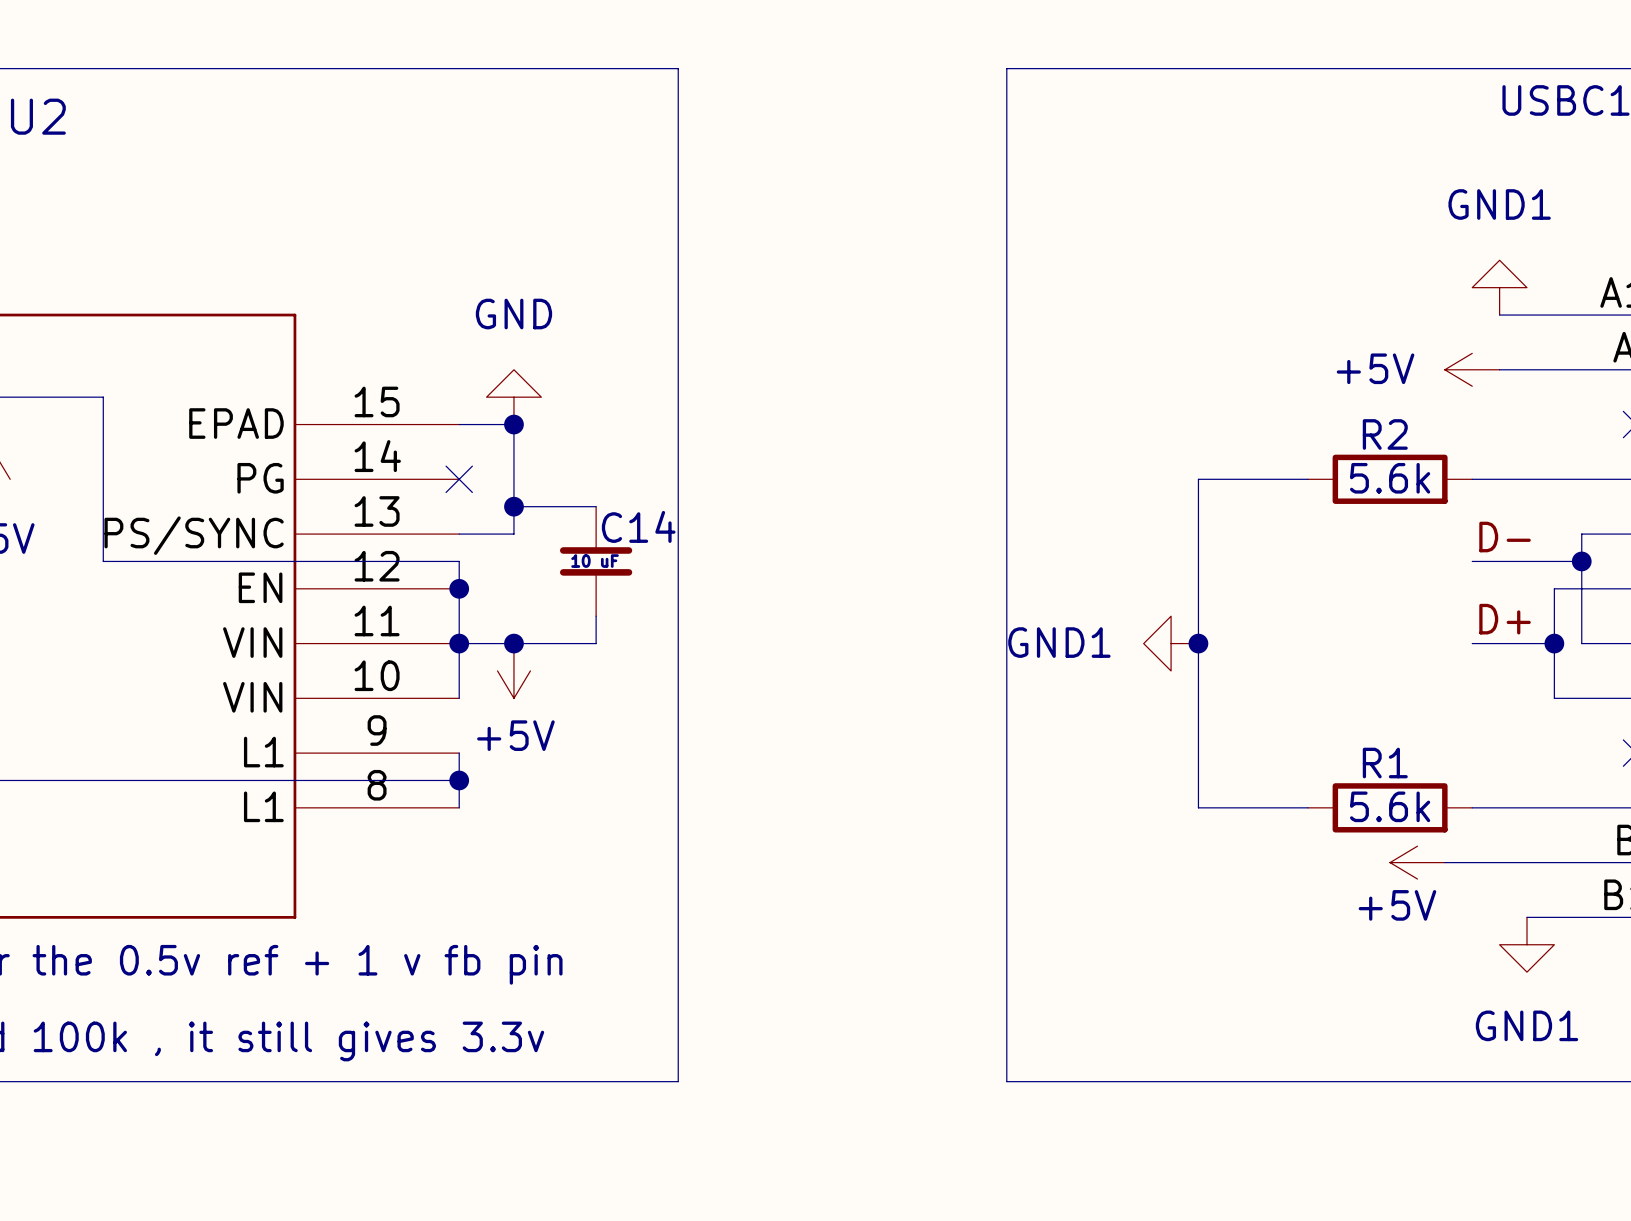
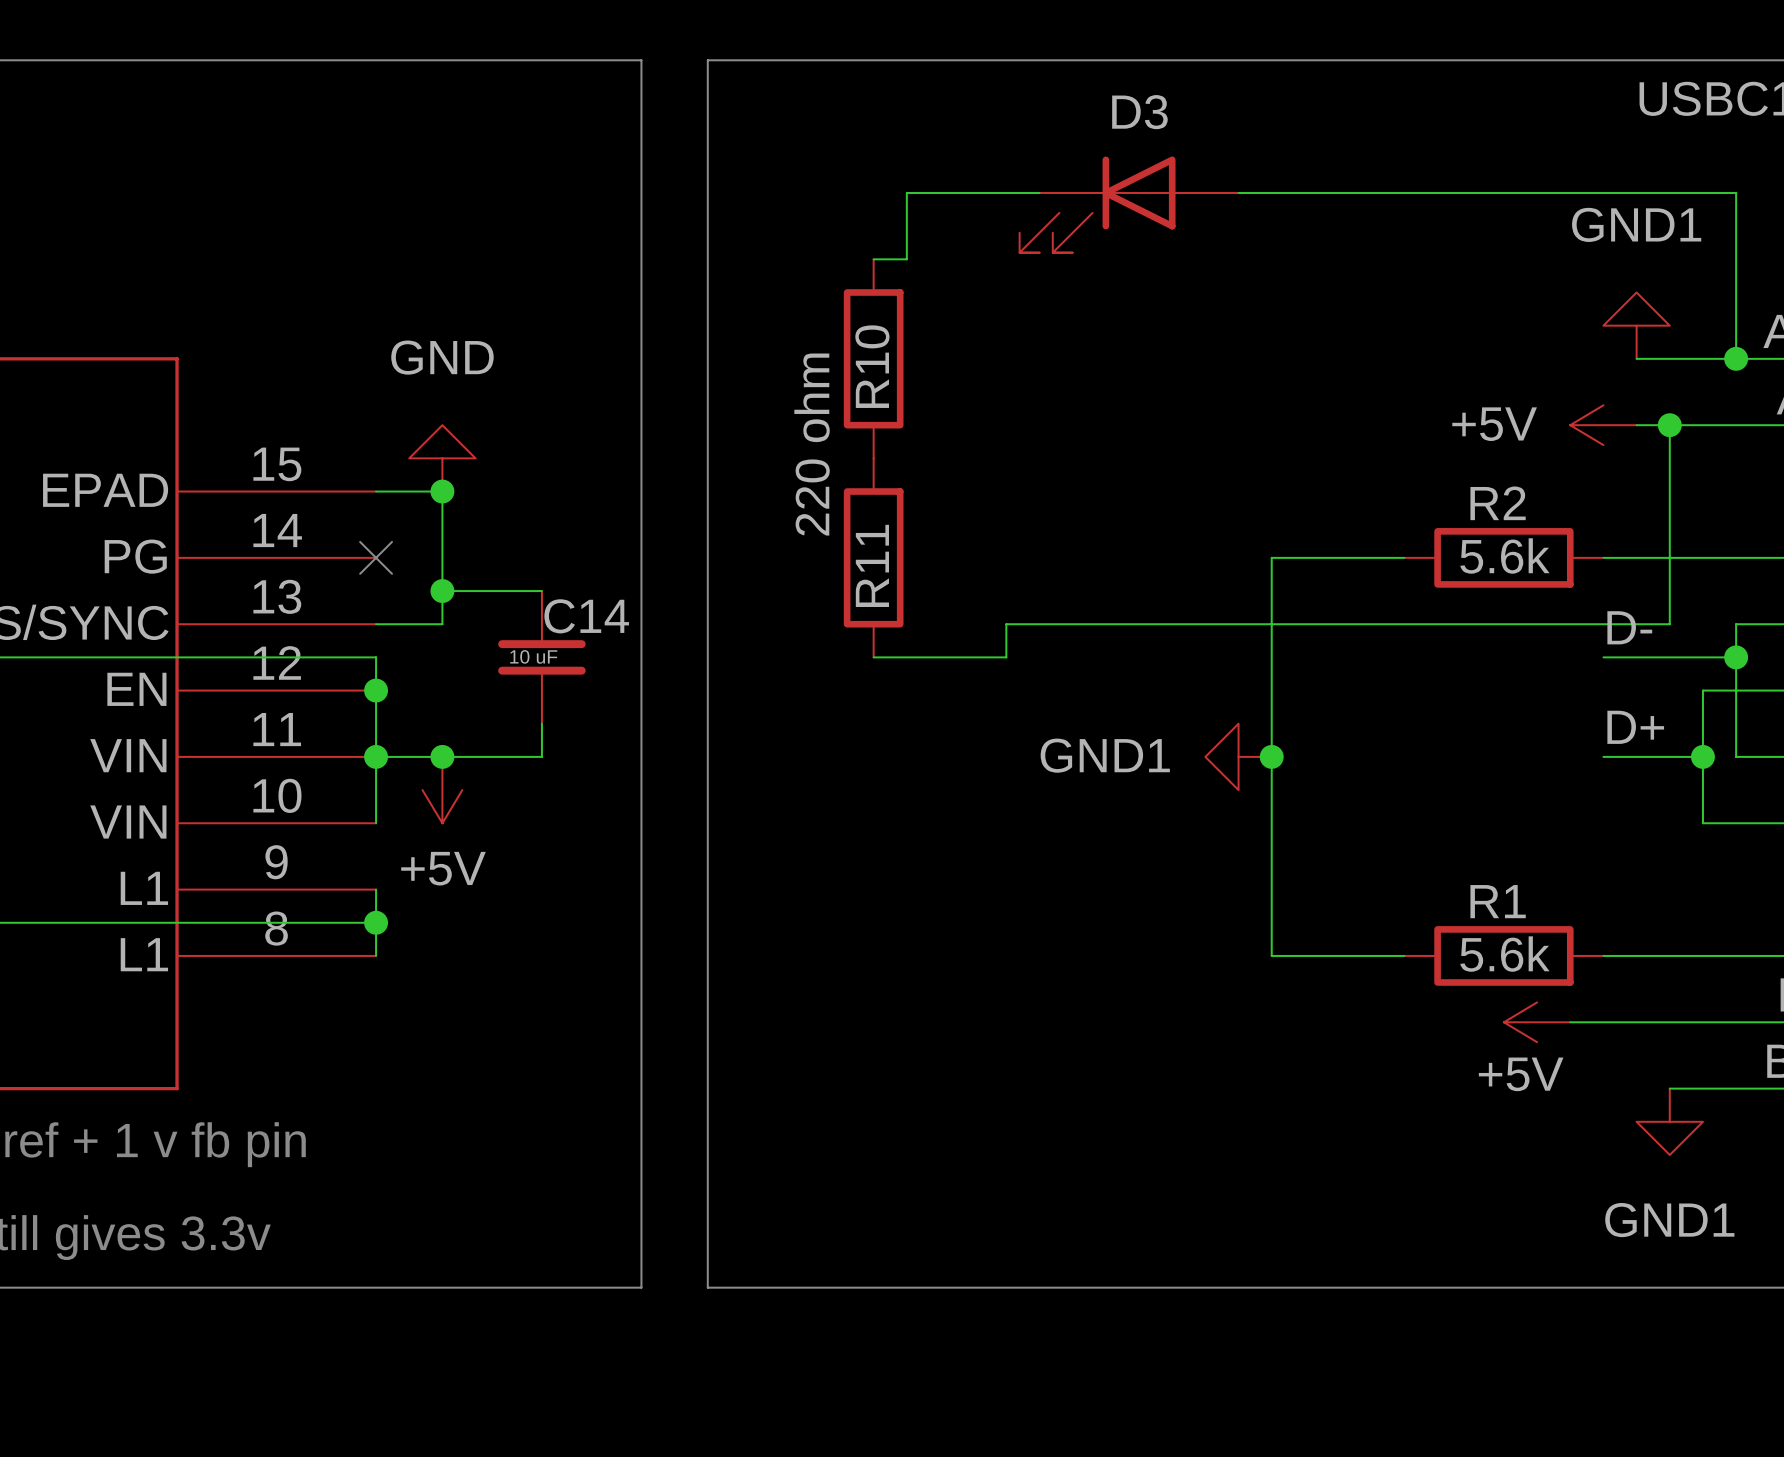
line: (1006, 68) (1006, 1081) -> (1039, 60) (707, 60) (707, 1287) (1039, 1287)
wire: none -> (1039, 192) (906, 192) (906, 259) (873, 259)
wire: none -> (1238, 192) (1736, 192) (1736, 358)
D3: none -> (1129, 204)
R10: none -> (873, 358)
junction: none -> (1736, 358)
wire: none -> (1669, 425) (1669, 624) (1006, 624) (1006, 657) (873, 657)
junction: none -> (1669, 425)
R11: none -> 220 ohm (873, 557)

